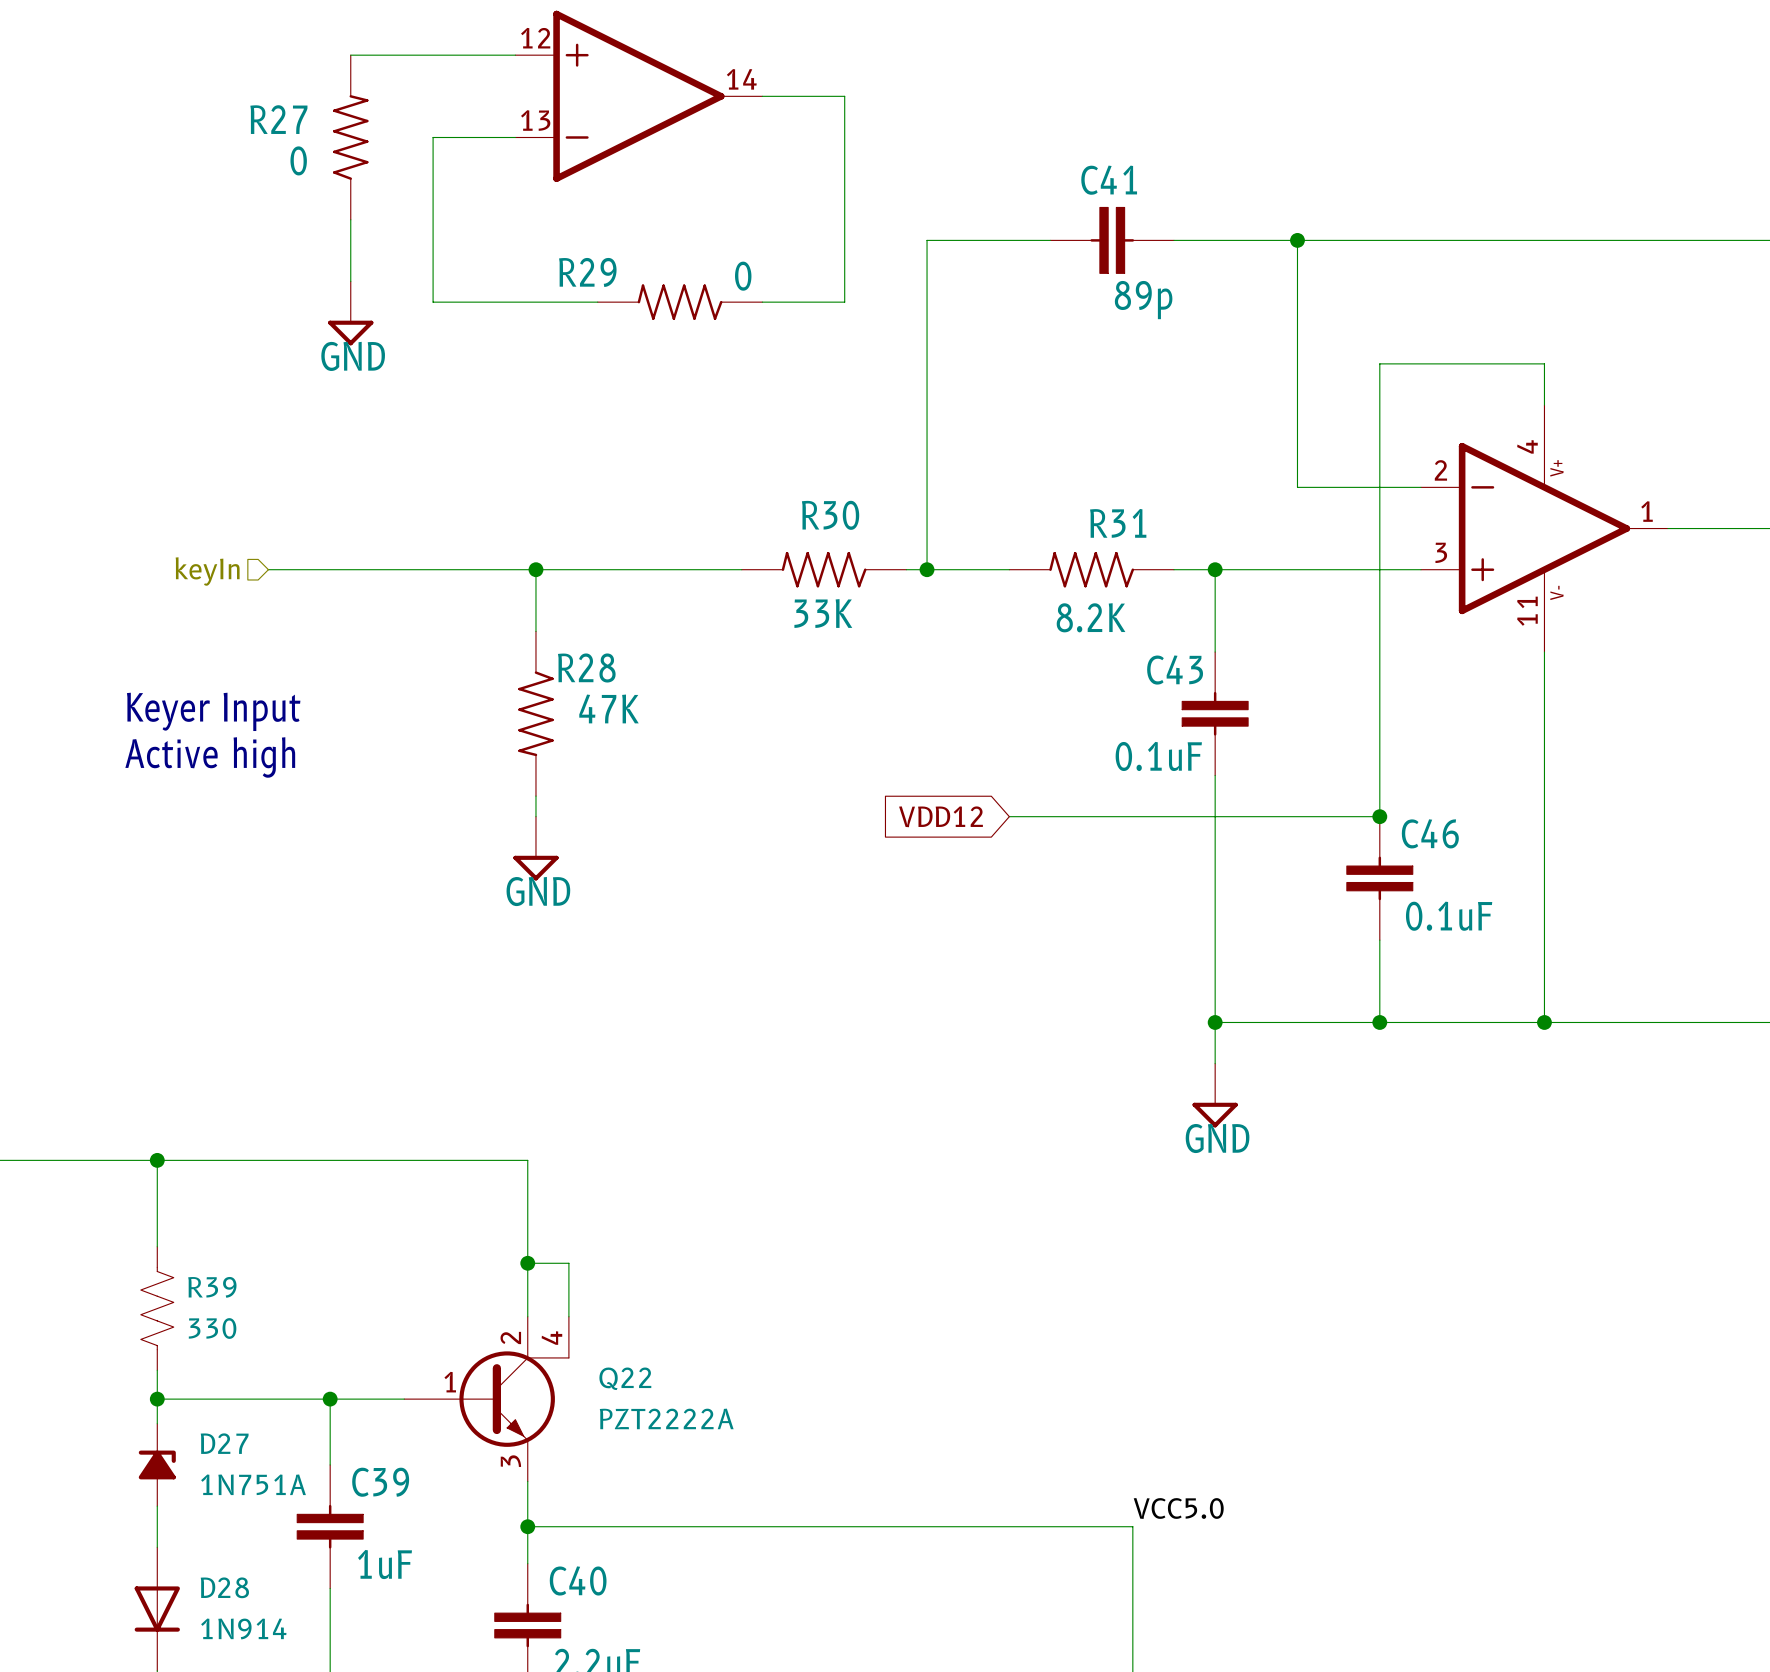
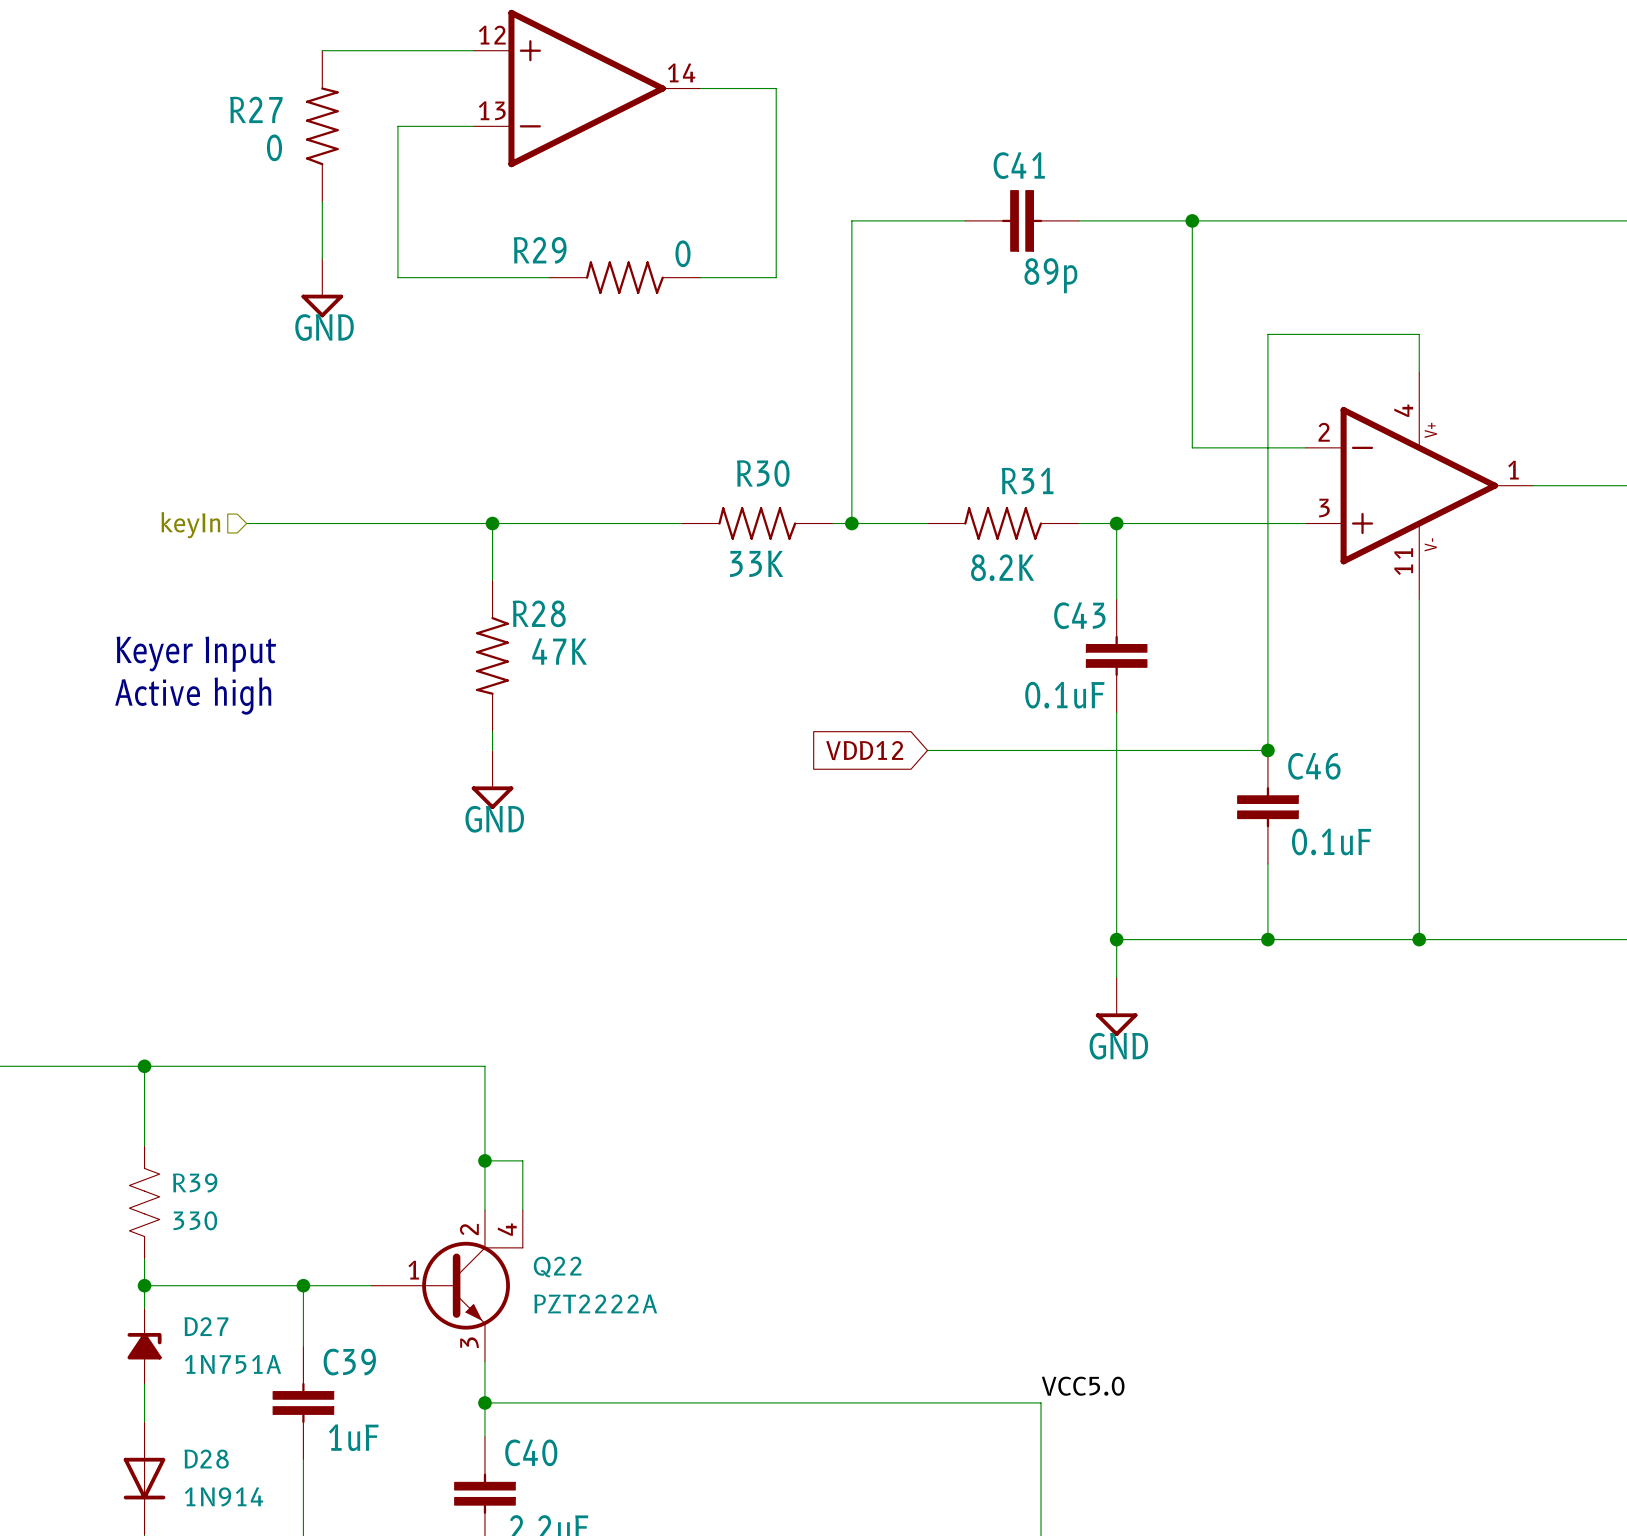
Q22 name position: Q22 (625, 1378) -> Q22 (557, 1267)
Q22 value position: PZT2222A (666, 1418) -> PZT2222A (595, 1303)

